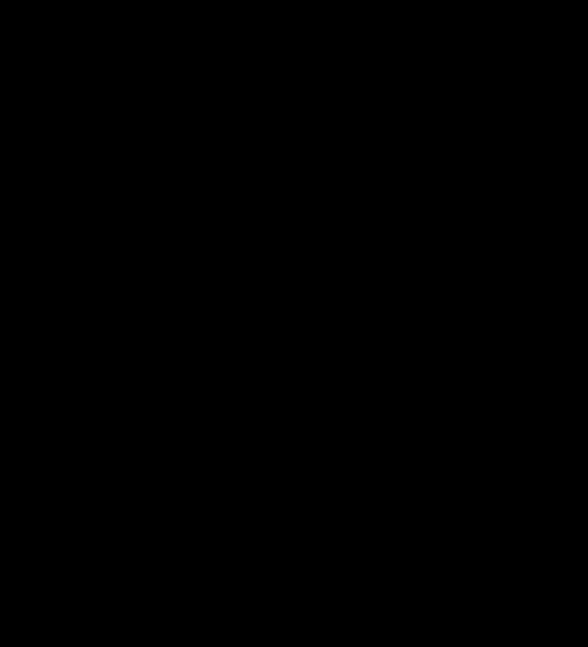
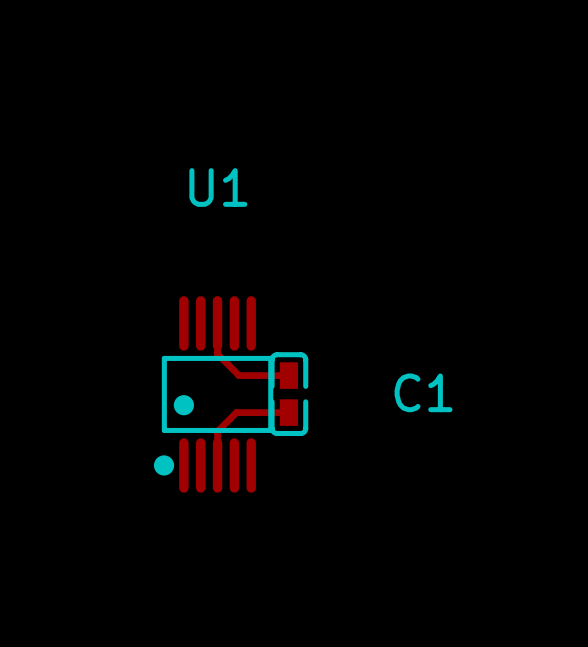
track: none -> (217, 323) (217, 354) (239, 375) (288, 375)
U1: none -> (213, 394)
C1: none -> (288, 394)
track: none -> (288, 412) (236, 412) (217, 431) (217, 465)

